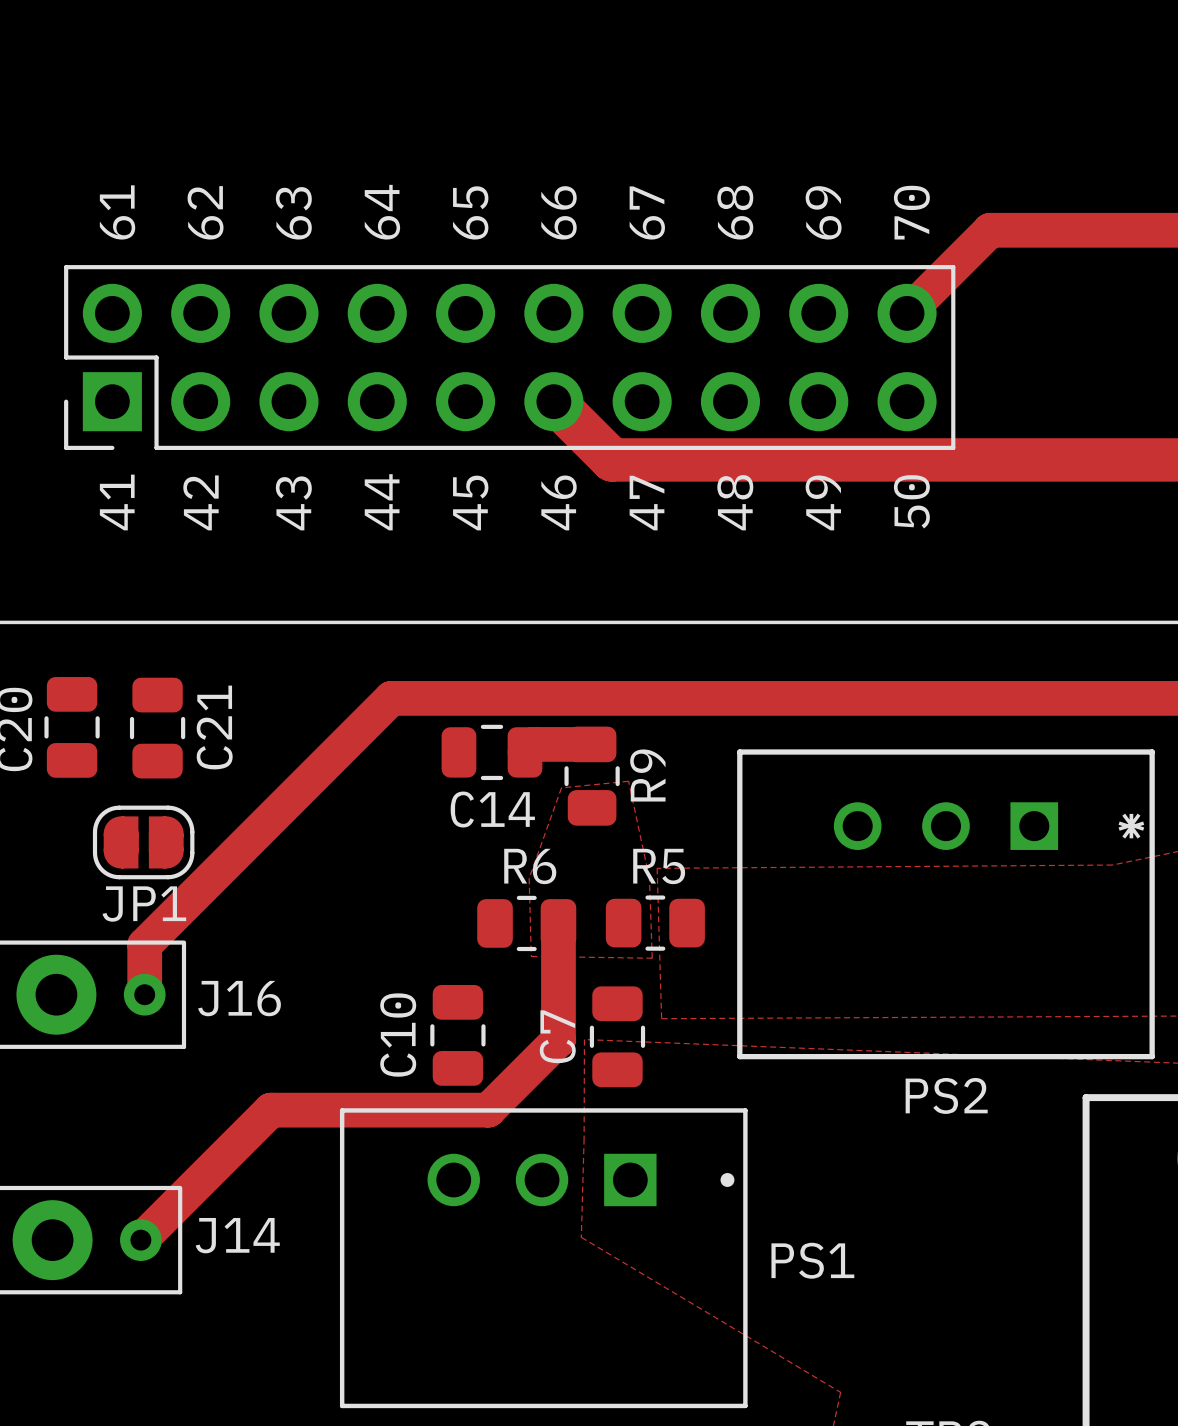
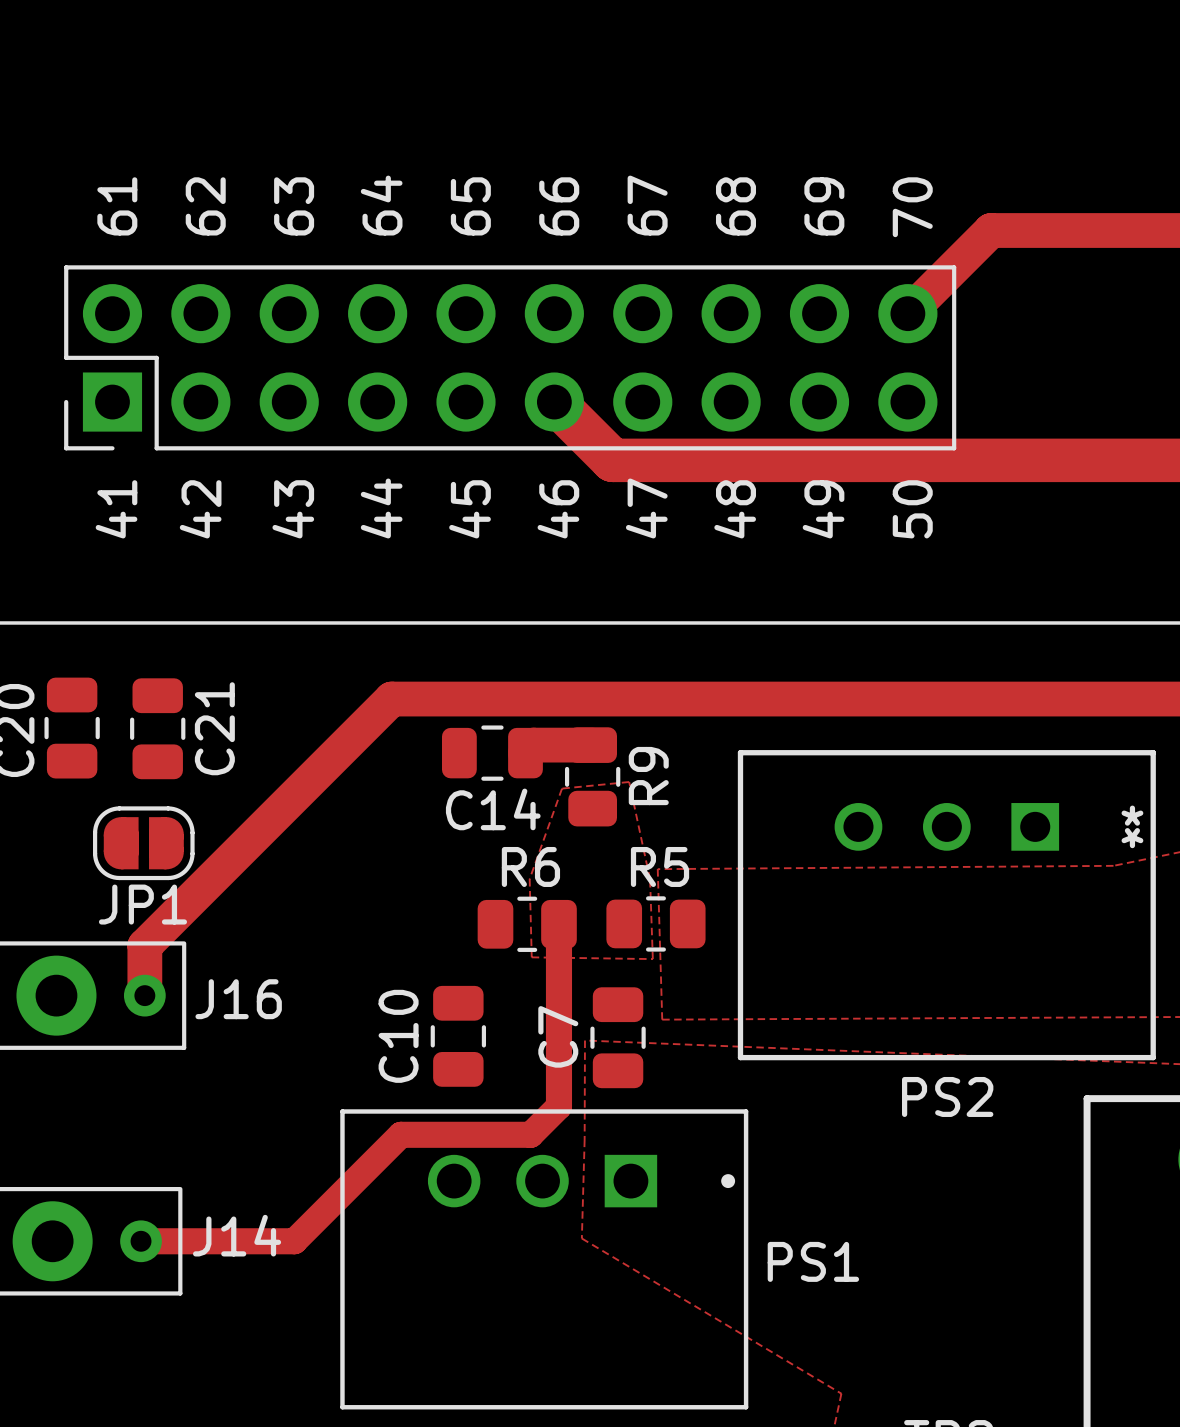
track width: thick (558, 923) (558, 1040) -> thin (558, 924) (558, 1041)
track: (558, 1040) (488, 1110) (270, 1110) (140, 1240) -> (558, 1041) (558, 1106) (530, 1134) (400, 1134) (294, 1241) (141, 1241)

